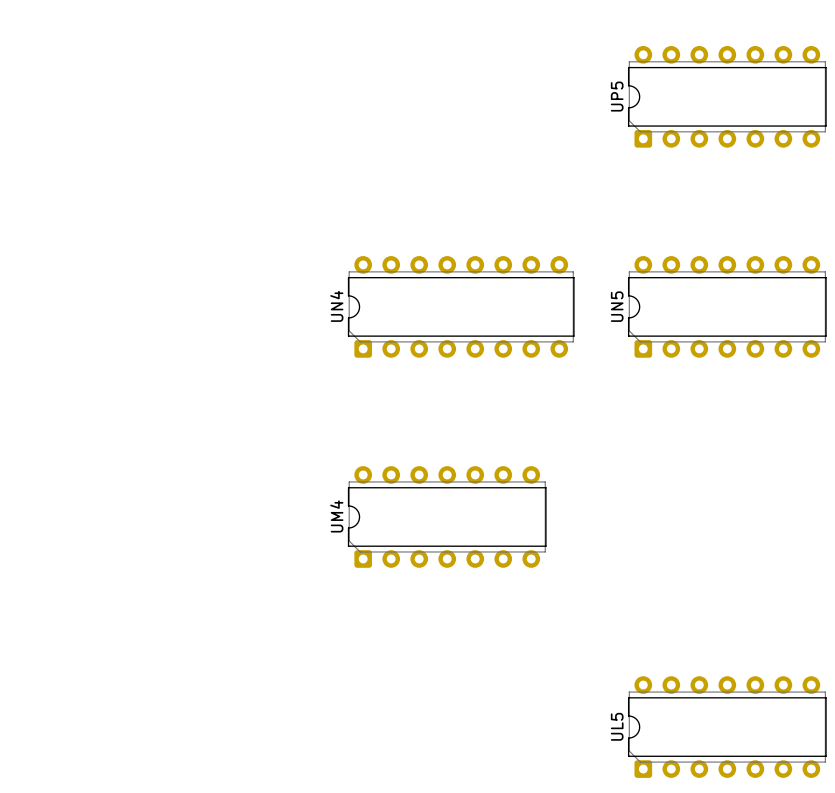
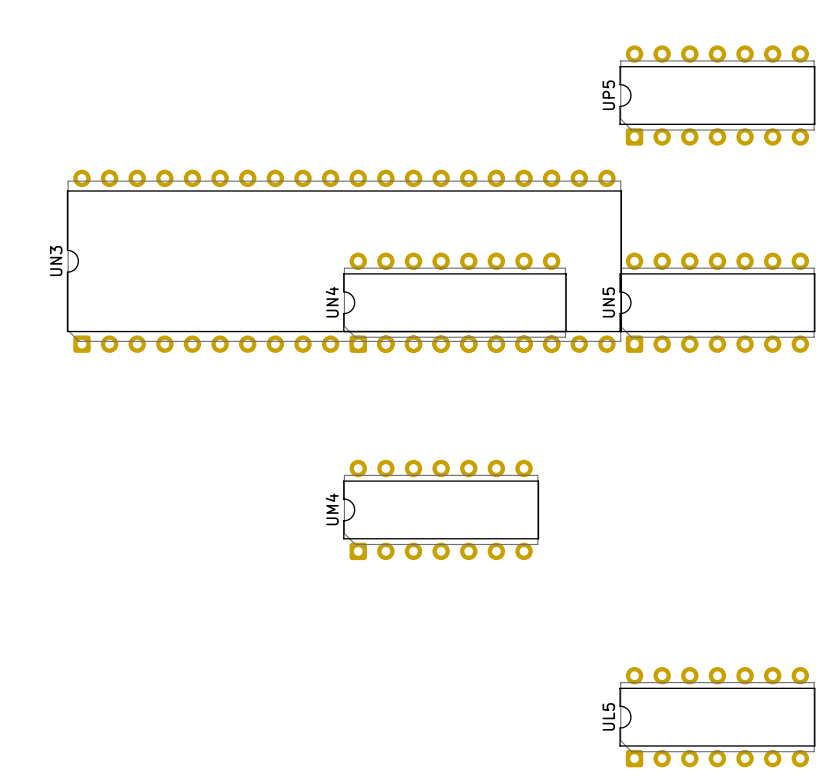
UN3: none -> (344, 261)

